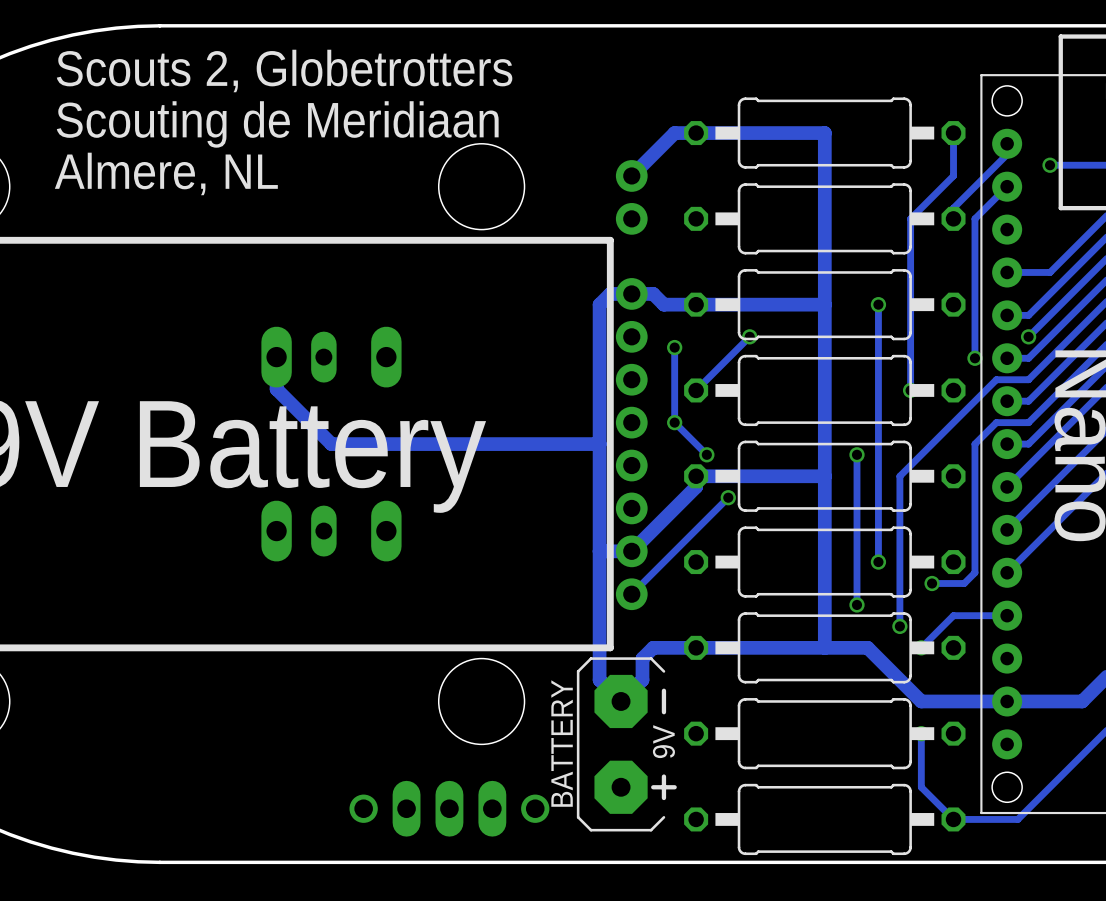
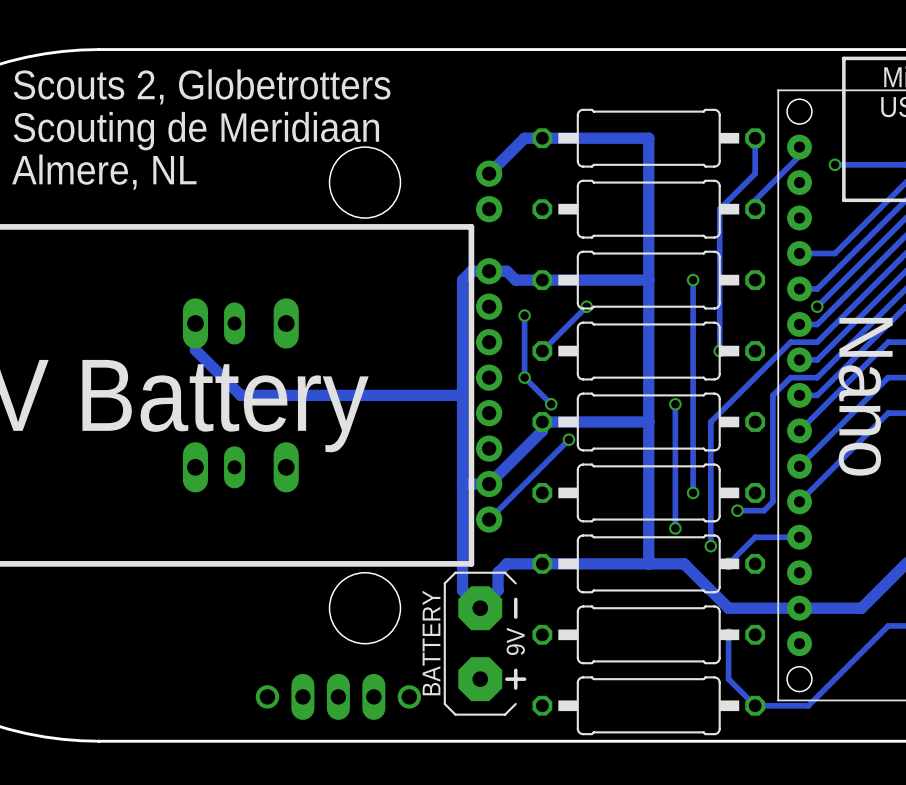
track: (1007, 186) (974, 218) (974, 358) -> none
via: (974, 358) -> none

